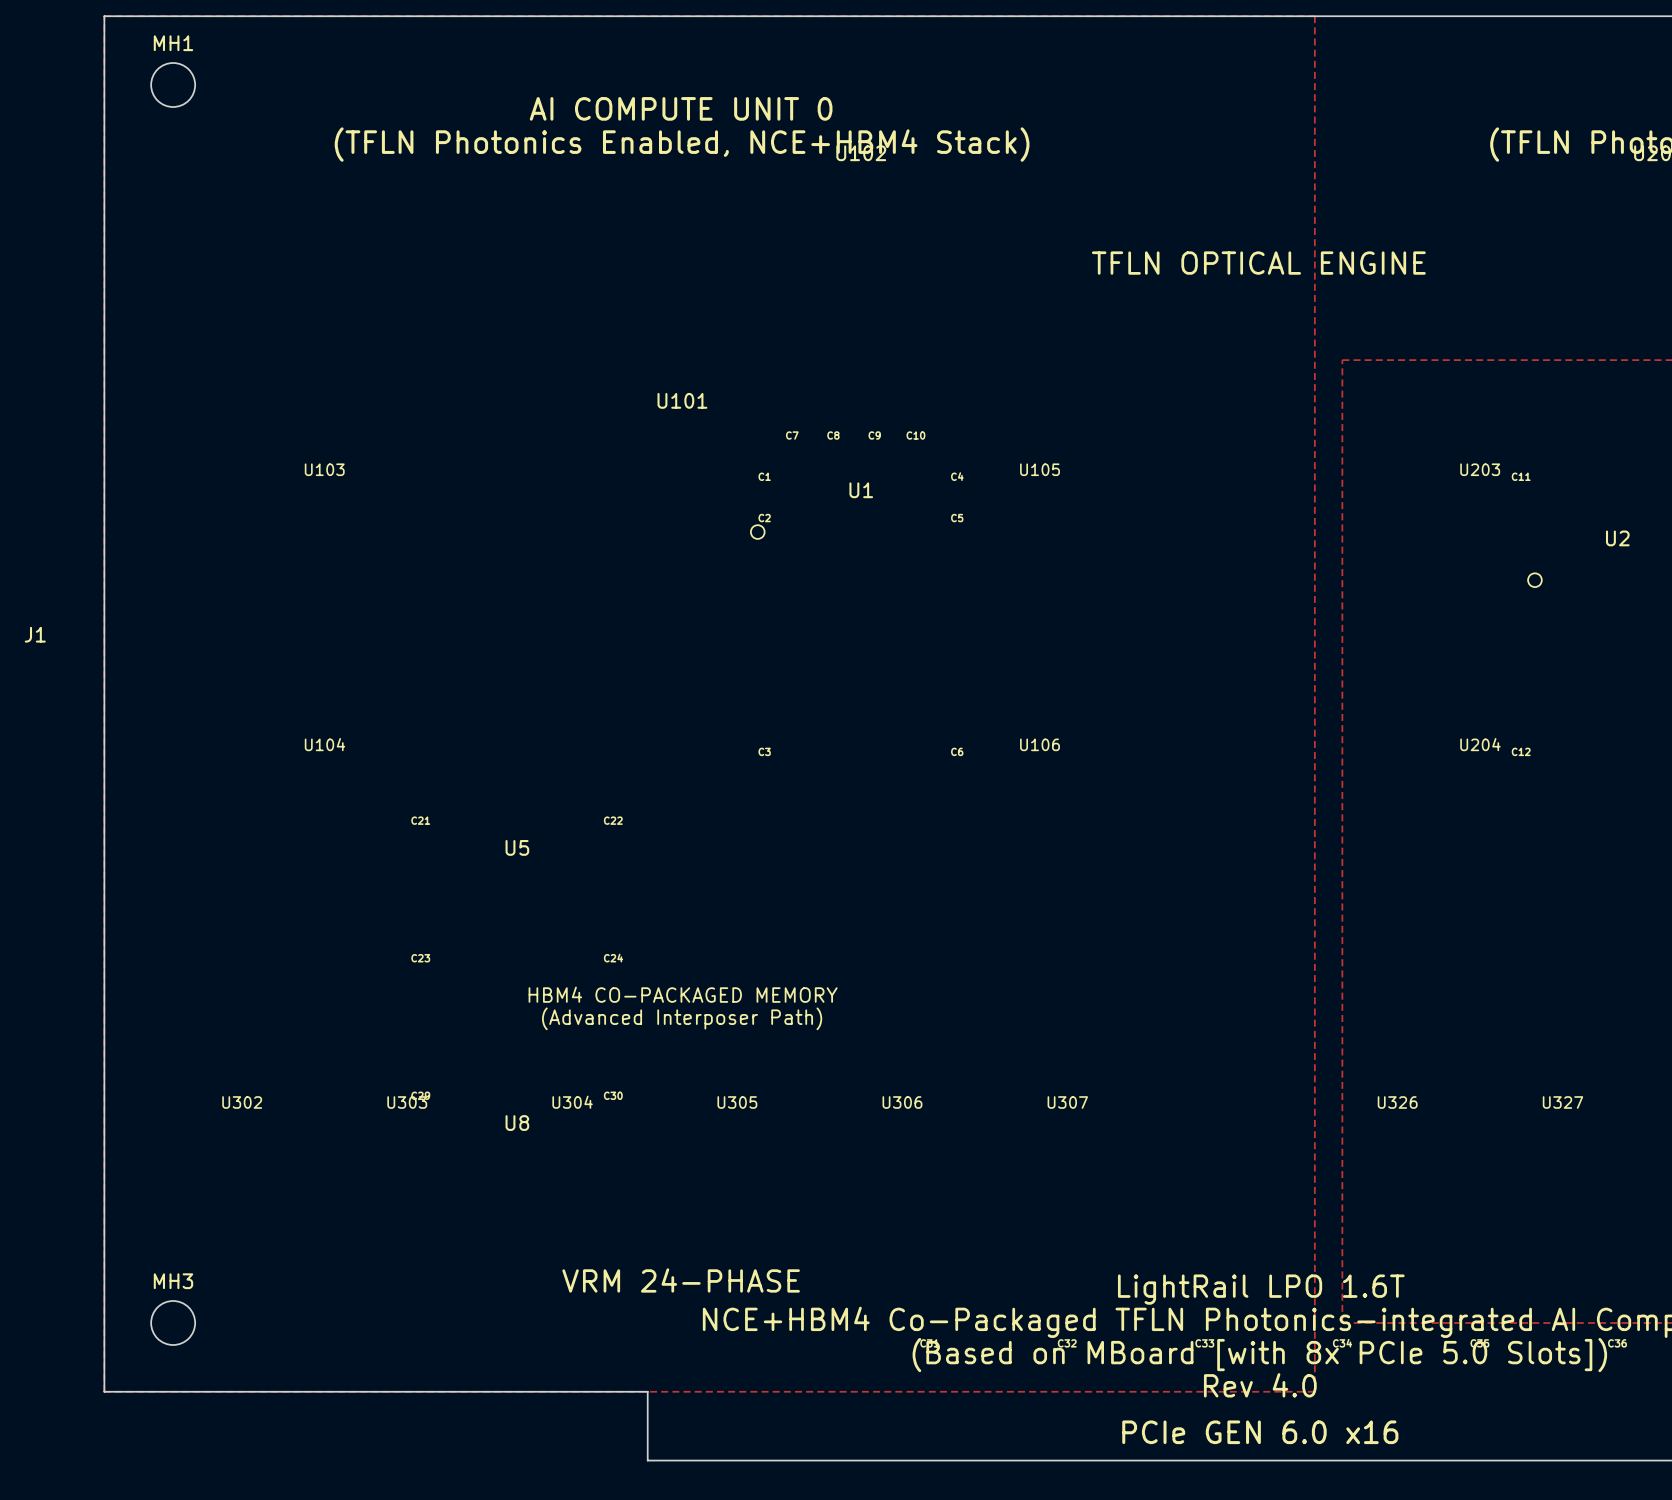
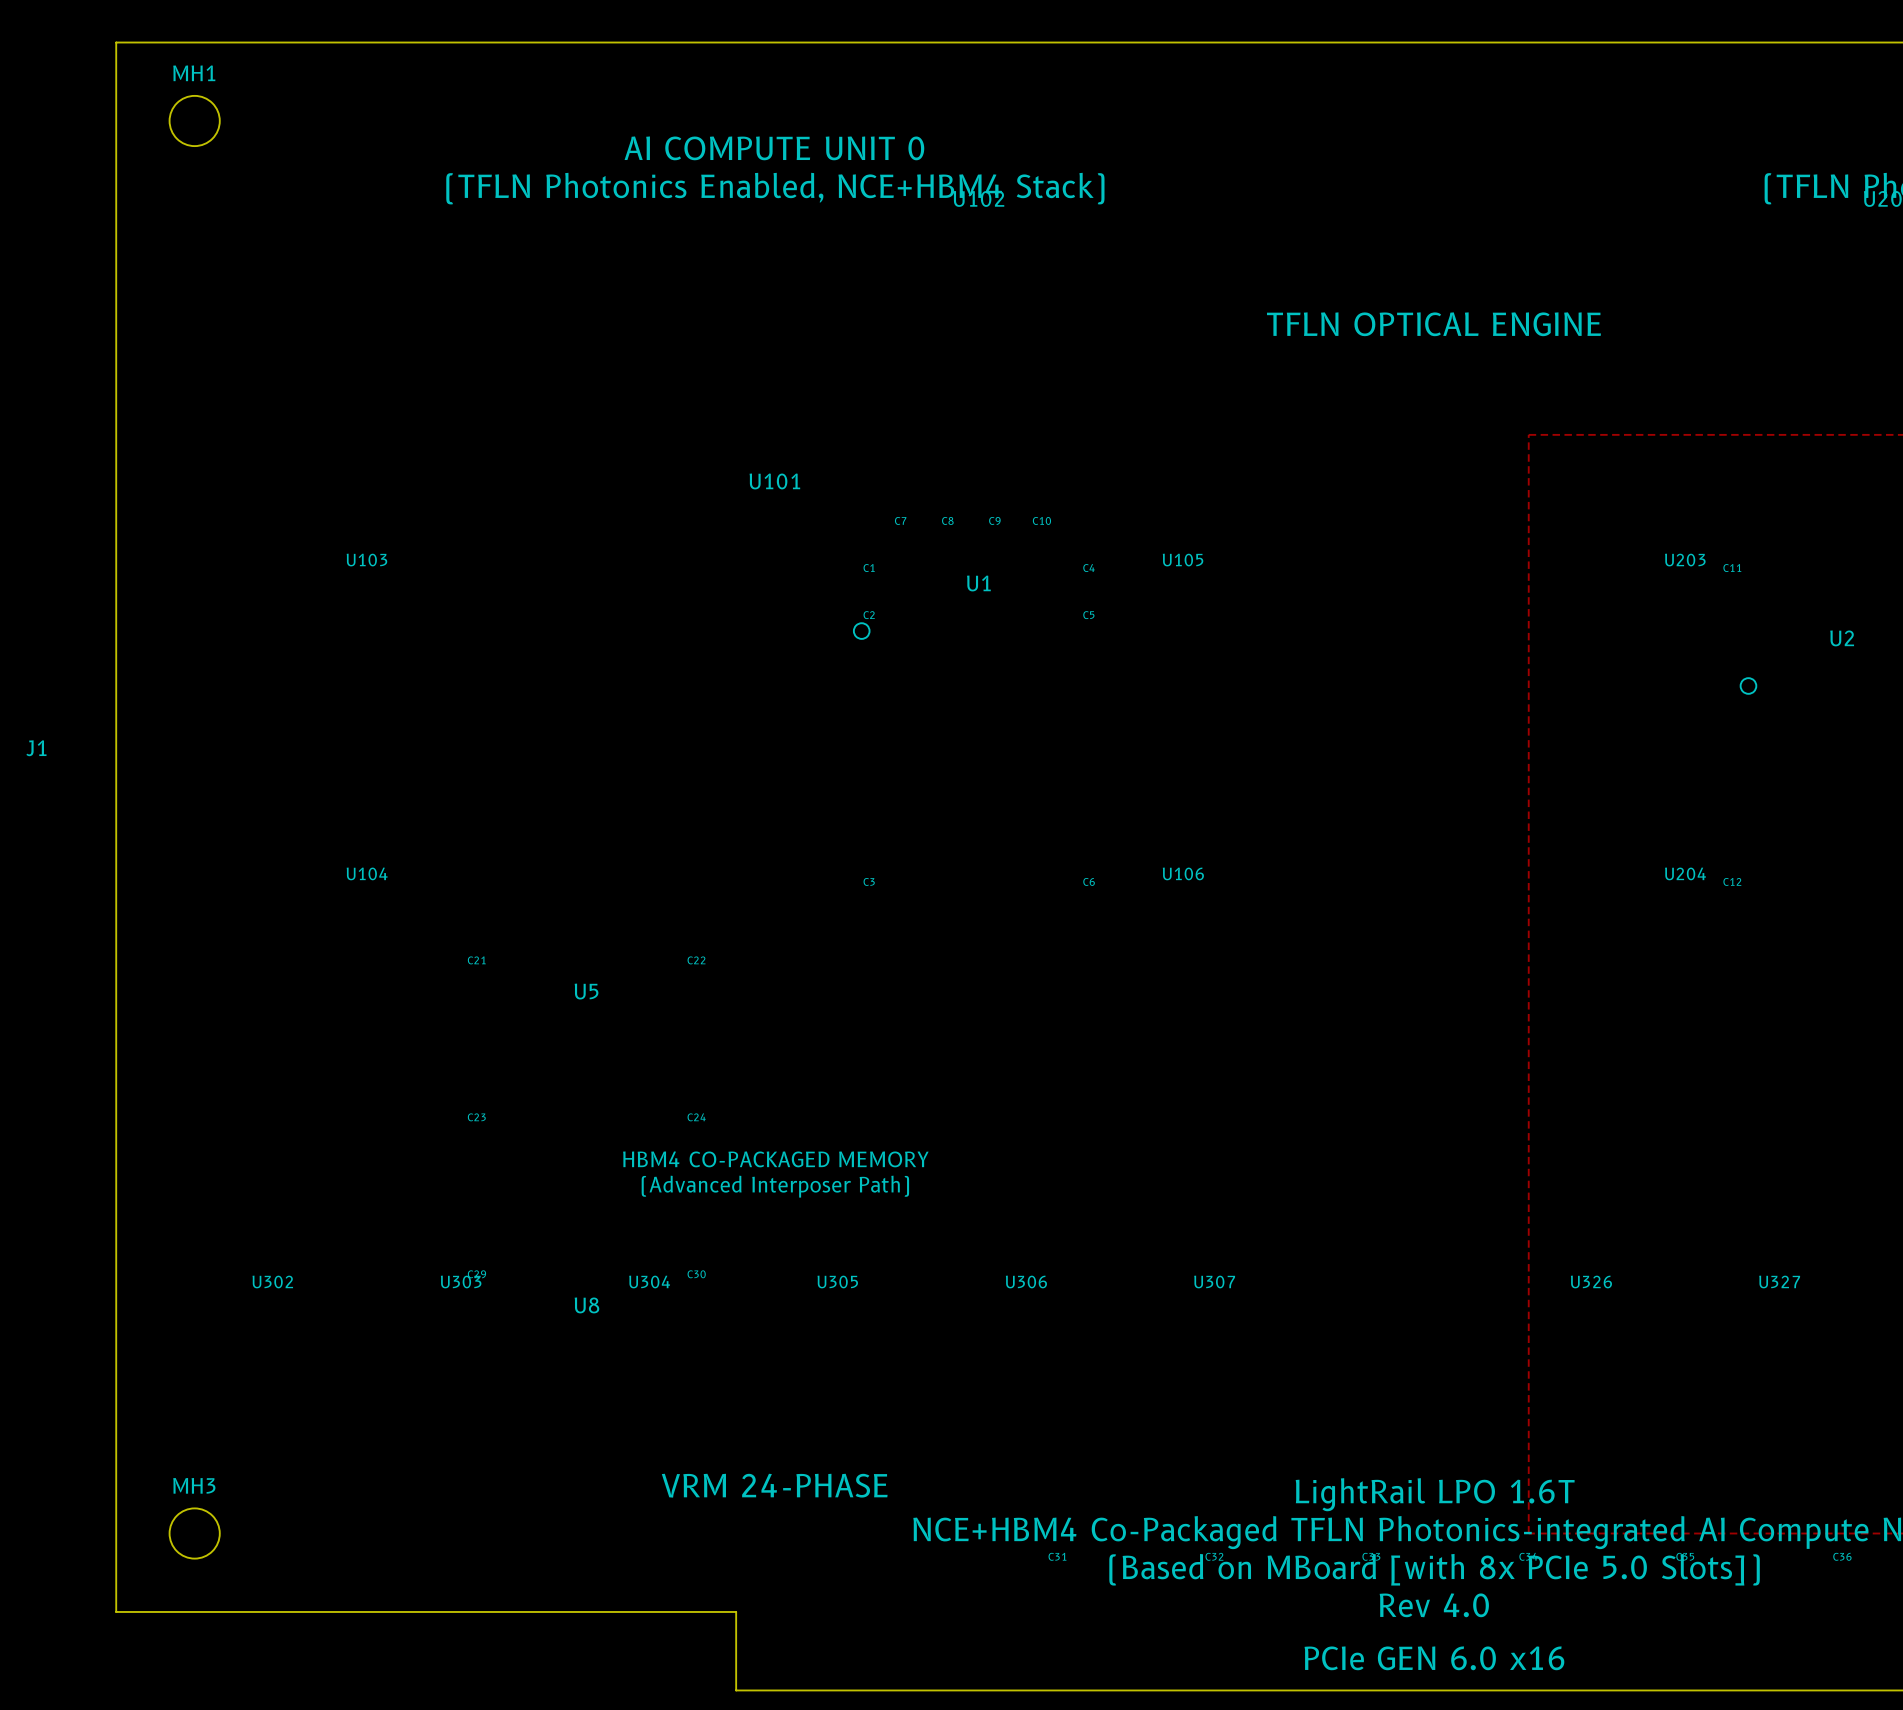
zone outline: (104, 16) (1314, 16) (1314, 1391) (104, 1391) (104, 16) -> none

